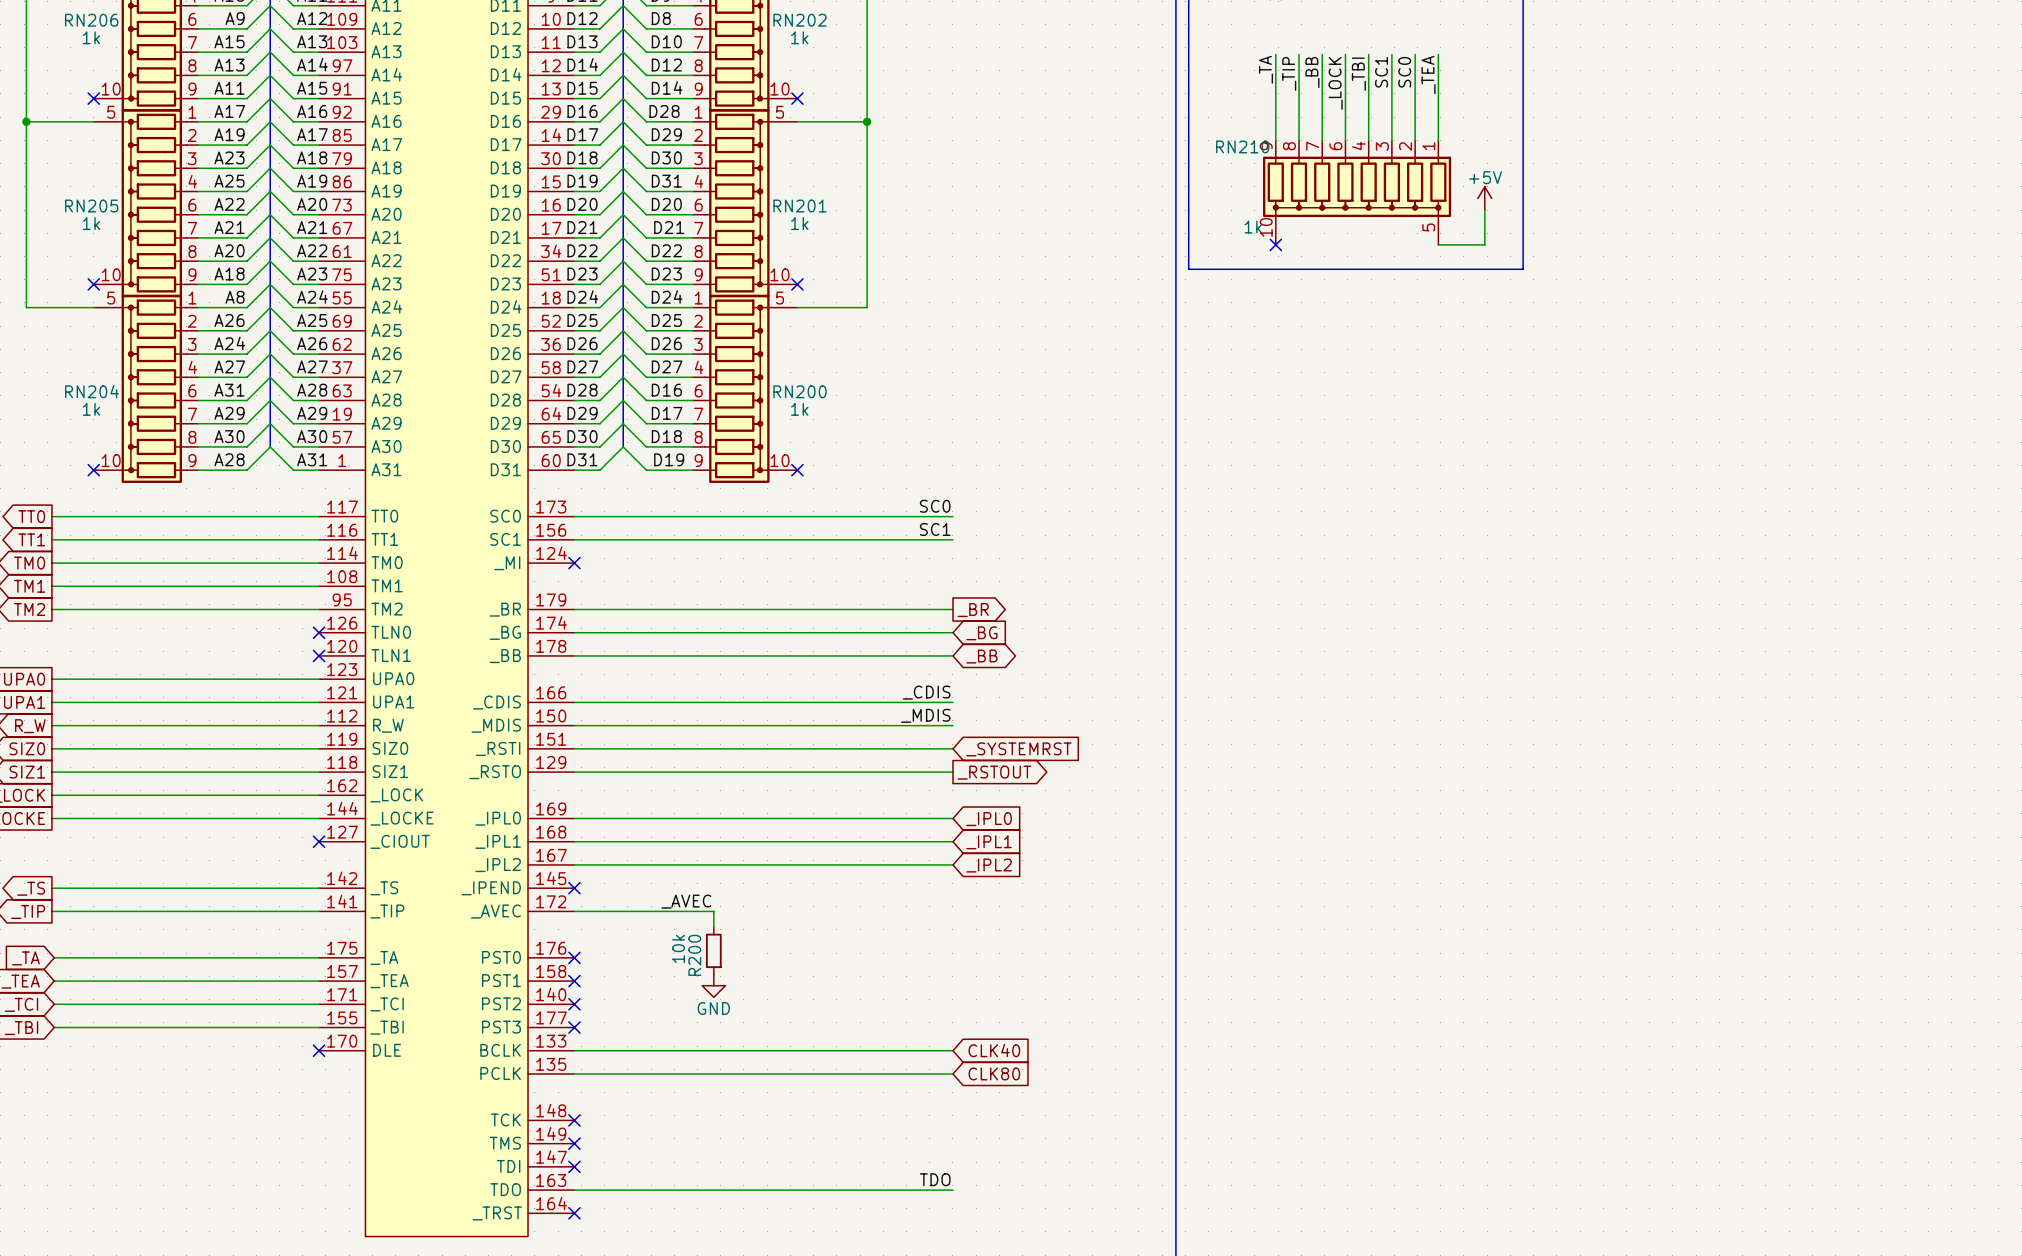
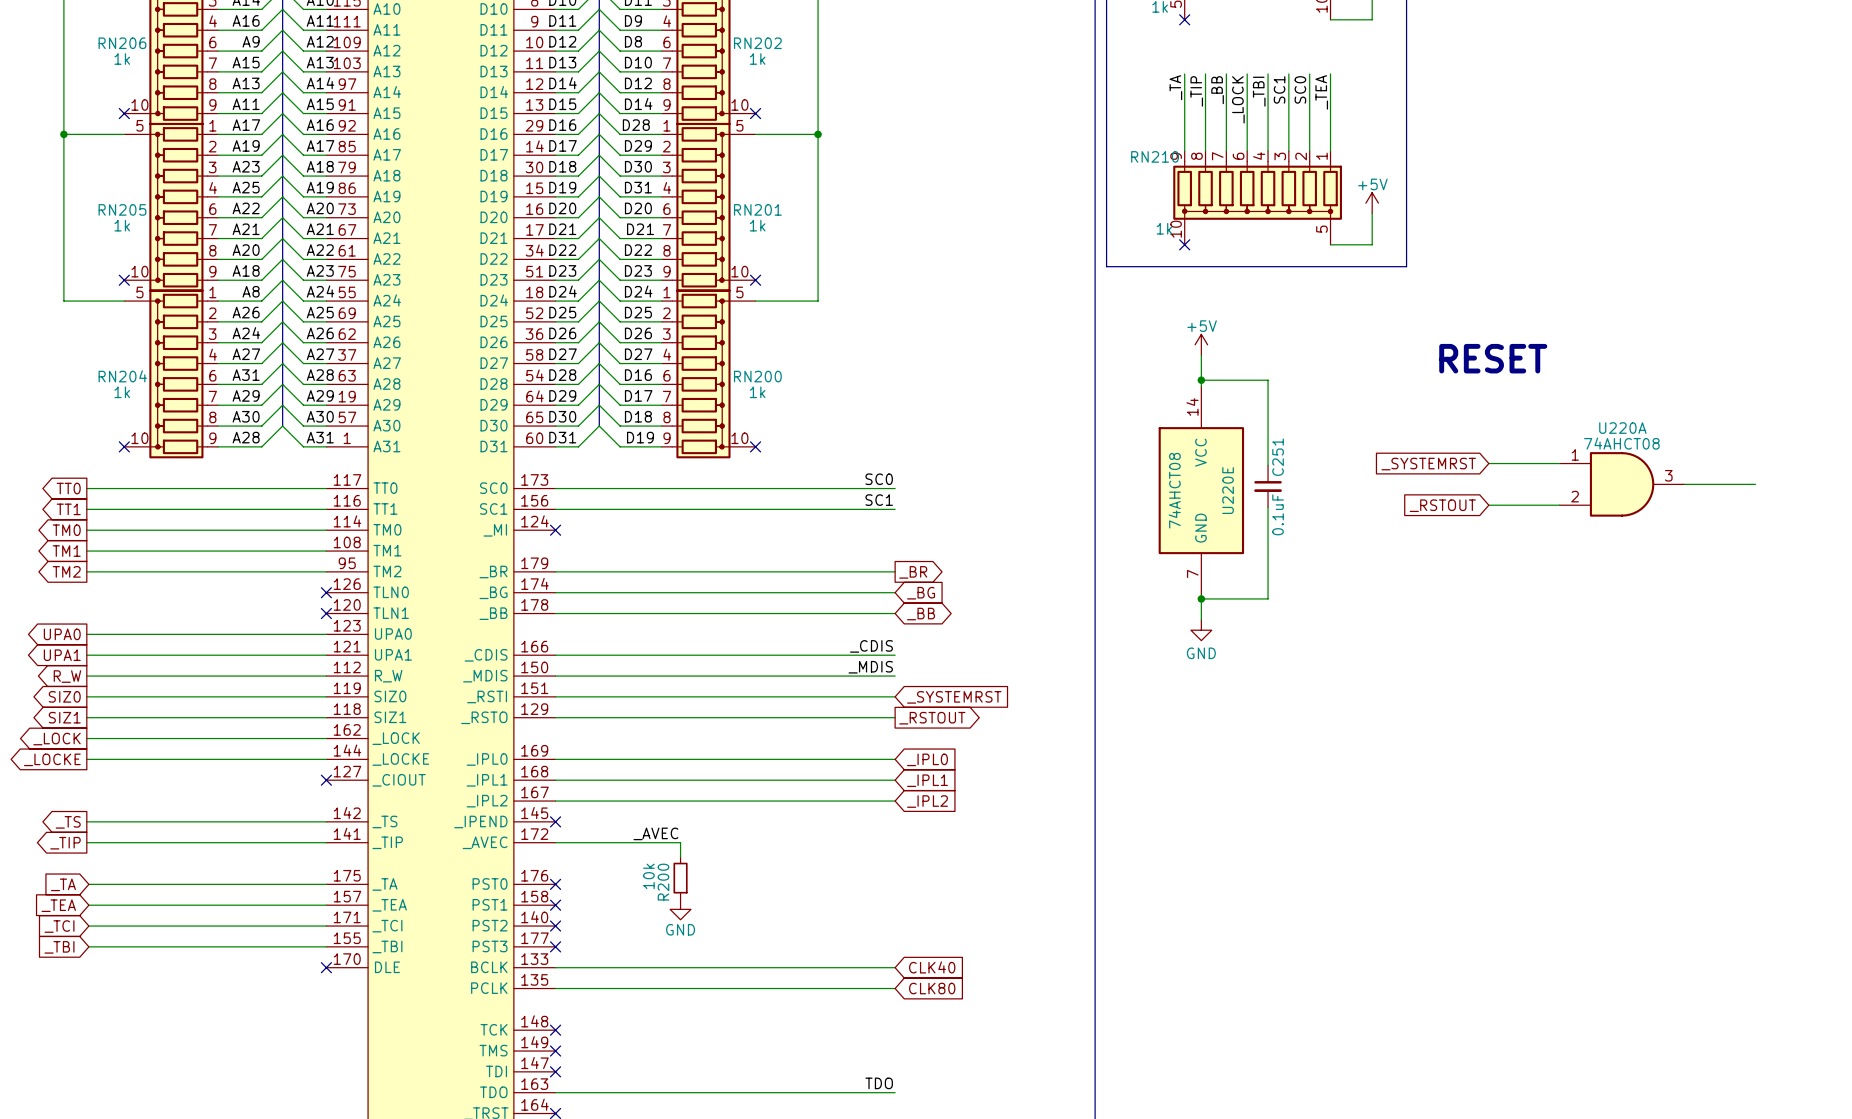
power symbol: none -> +5V (1201, 344)
wire: none -> (1201, 355) (1201, 386)
text: none -> RESET (1493, 358)
wire: none -> (1201, 380) (1268, 380) (1268, 465)
junction: none -> (1201, 380)
wire: none -> (1488, 463) (1559, 463)
global label: none -> _SYSTEMRST (1428, 464)
U220A: none -> 74AHCT08 (1622, 484)
wire: none -> (1684, 484) (1755, 484)
C251: none -> 0.1uF (1268, 486)
U220E: none -> 74AHCT08 (1201, 490)
global label: none -> _RSTOUT (1442, 505)
wire: none -> (1488, 505) (1559, 505)
wire: none -> (1268, 507) (1268, 598) (1201, 598)
wire: none -> (1201, 594) (1201, 619)
junction: none -> (1201, 598)
power symbol: none -> GND (1201, 630)

